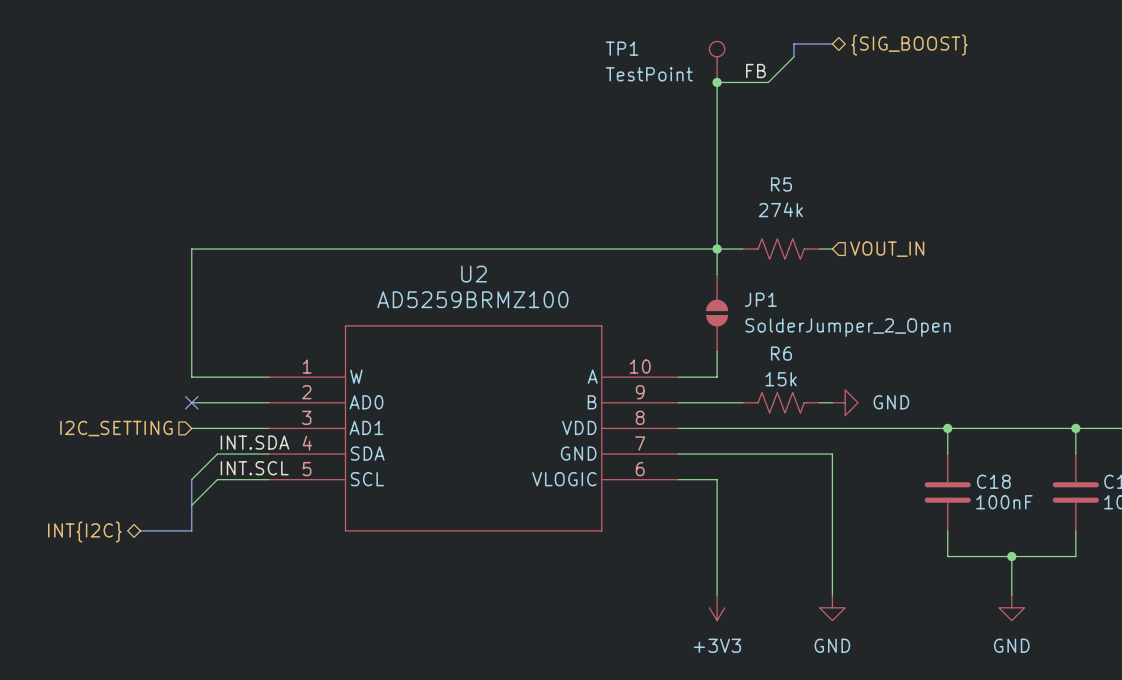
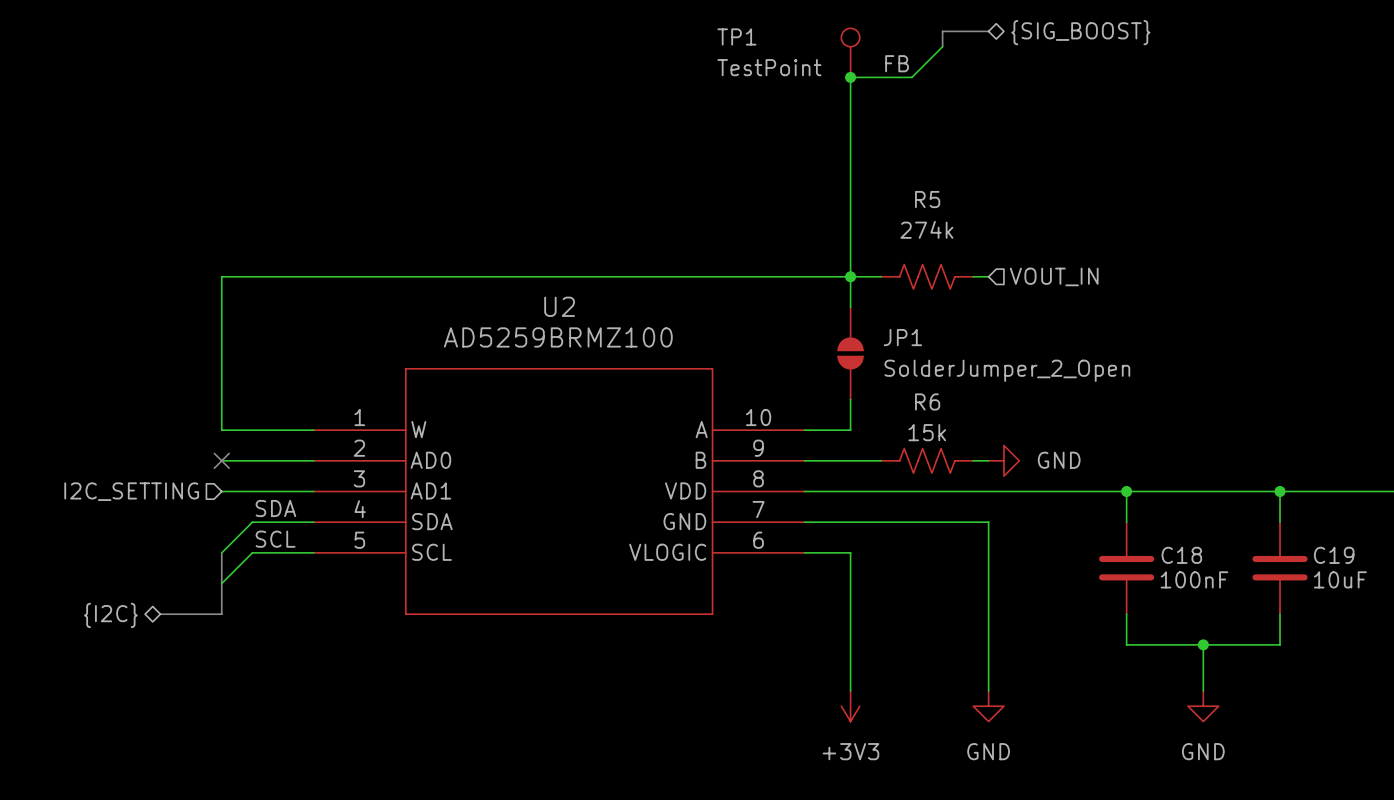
label: INT.SDA (254, 442) -> SDA (275, 508)
label: INT.SCL (254, 468) -> SCL (275, 539)
hierarchical label: INT{I2C} (84, 531) -> {I2C} (110, 615)

